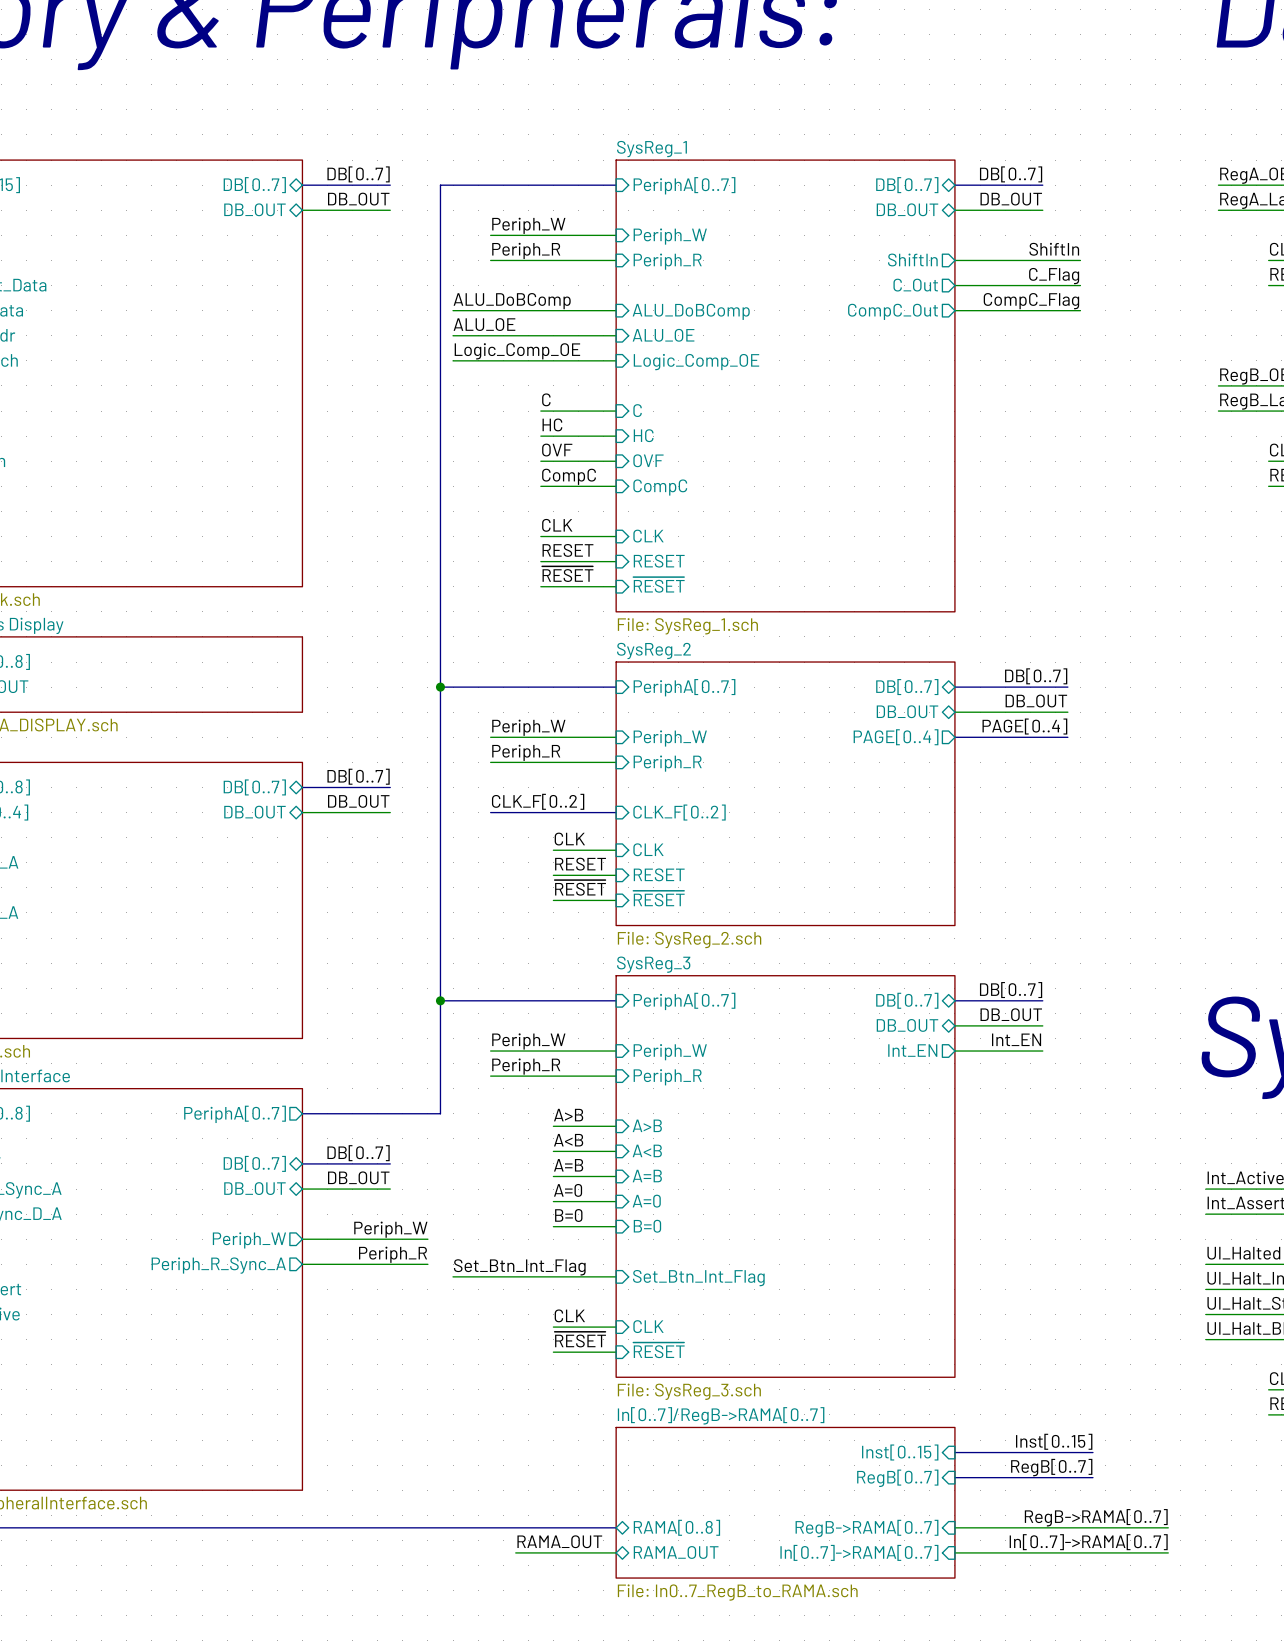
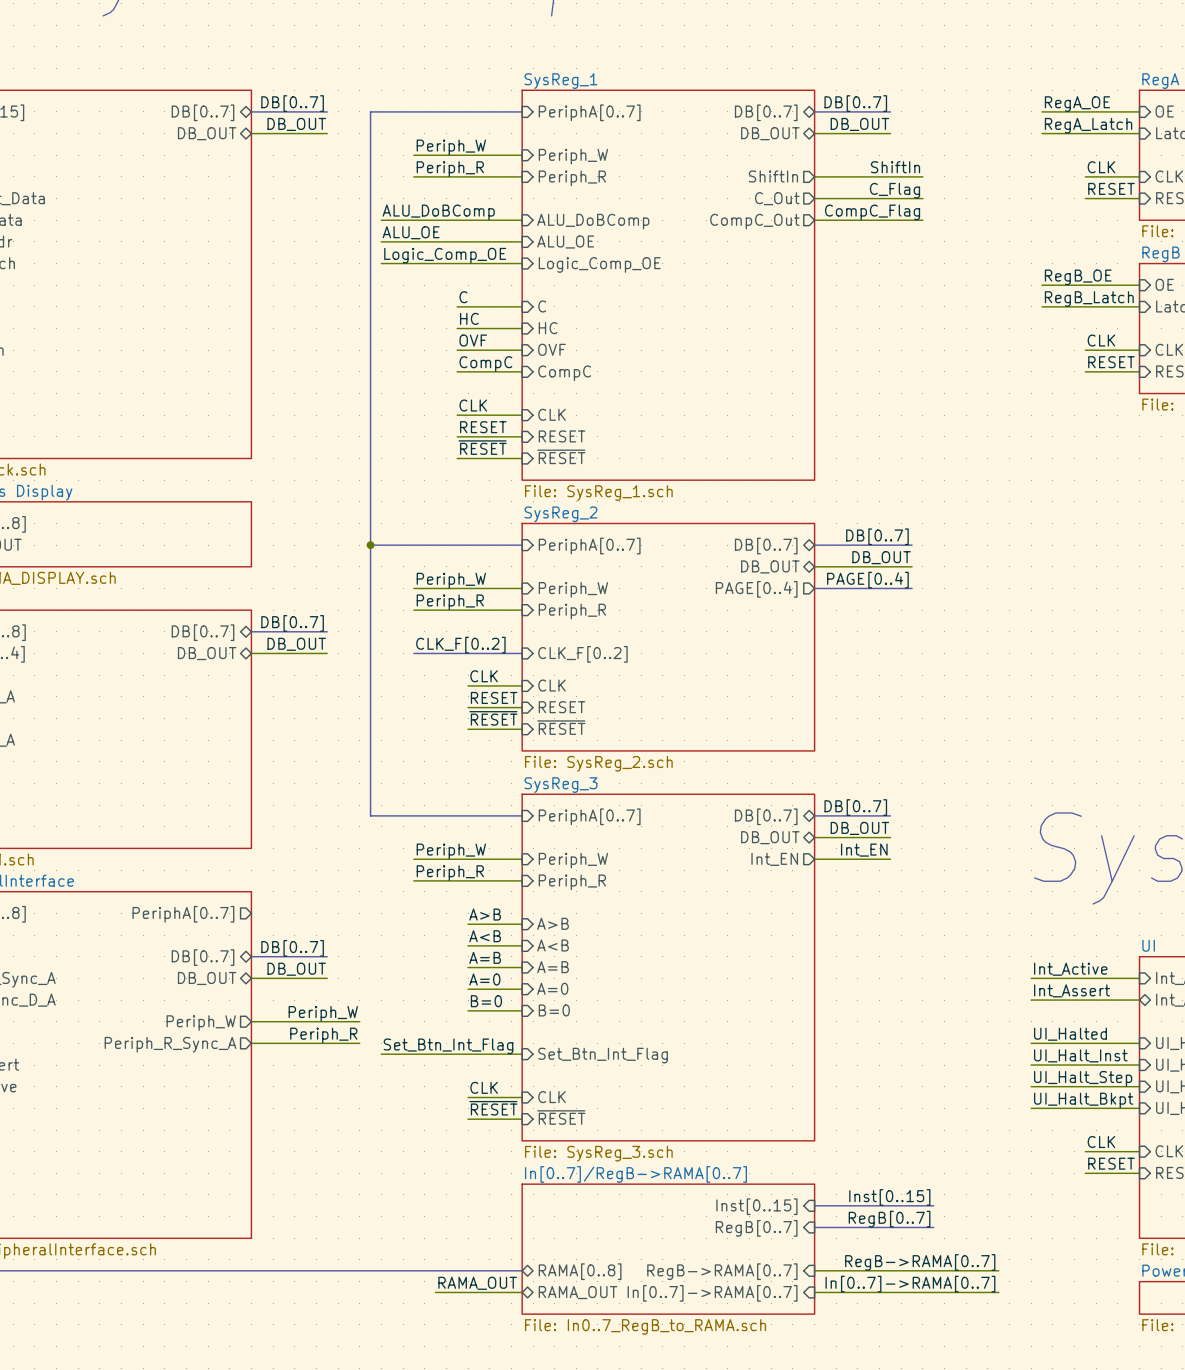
bus: (440, 1000) (440, 1113) (302, 1113) -> none
junction: (440, 1000) -> none

